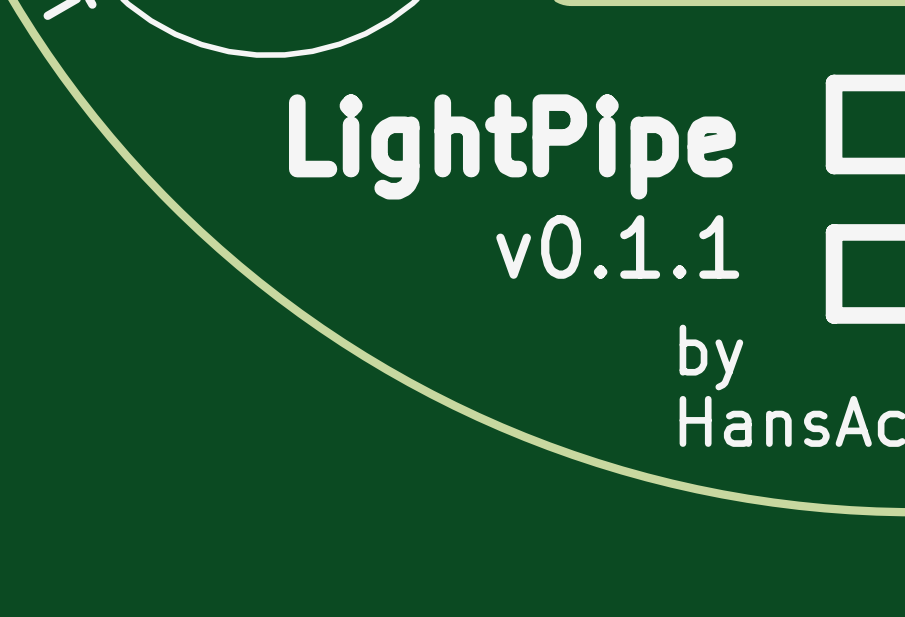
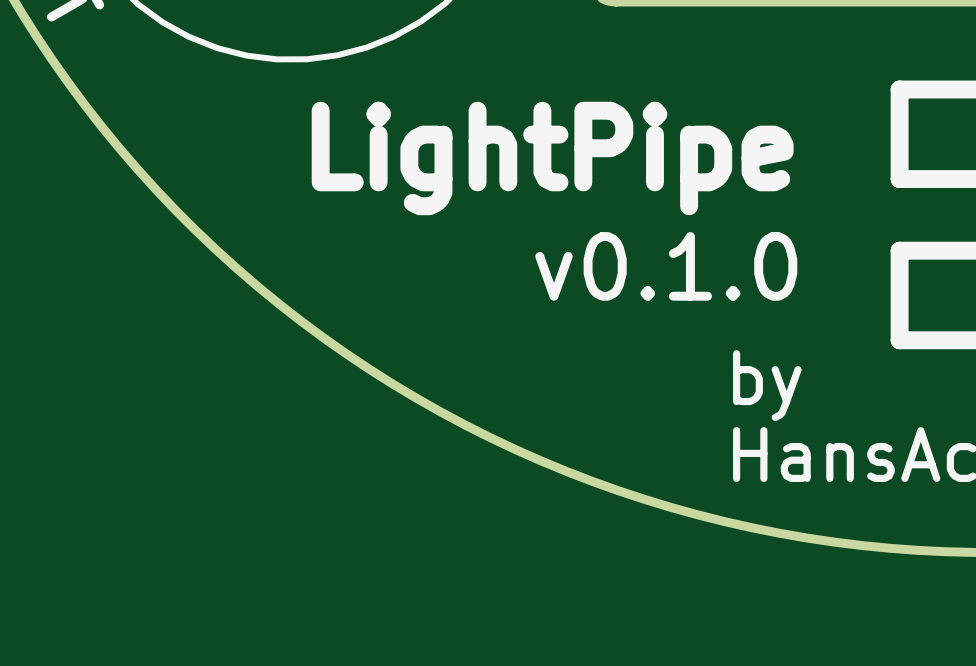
text: v0.1.1 (617, 246) -> v0.1.0 (666, 266)

